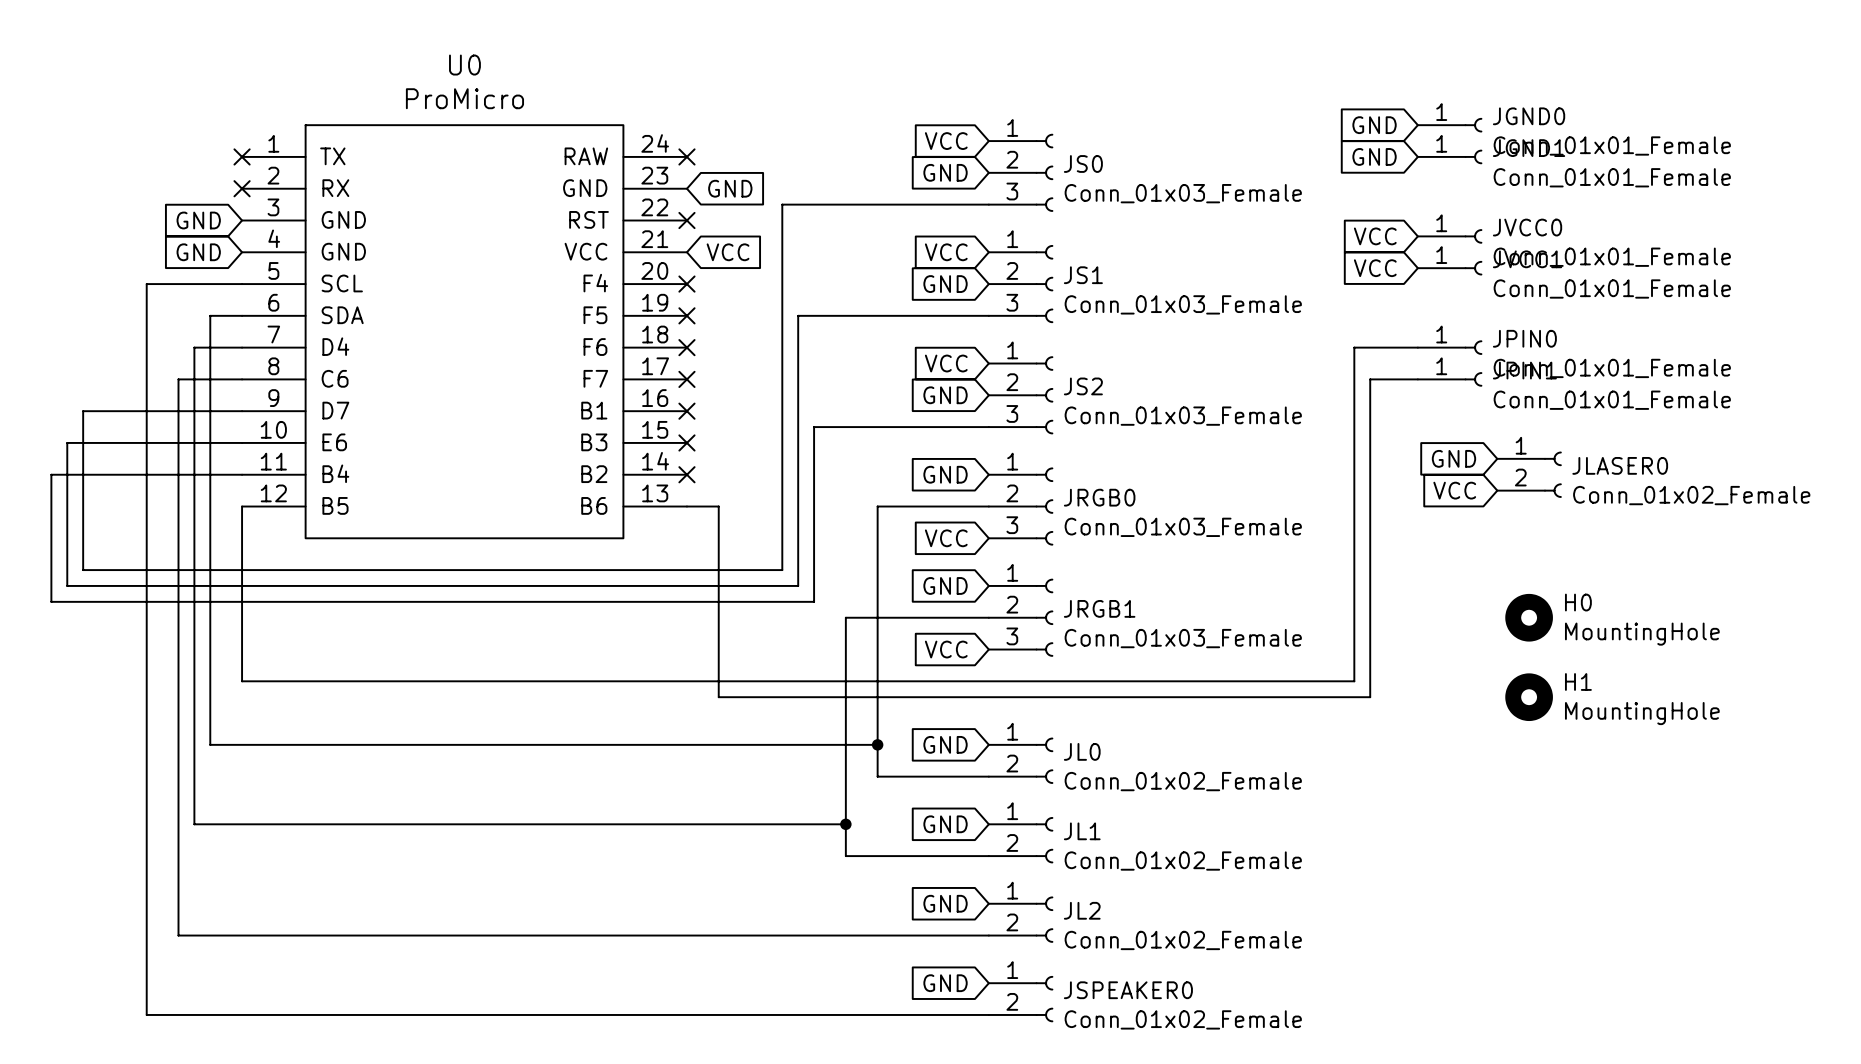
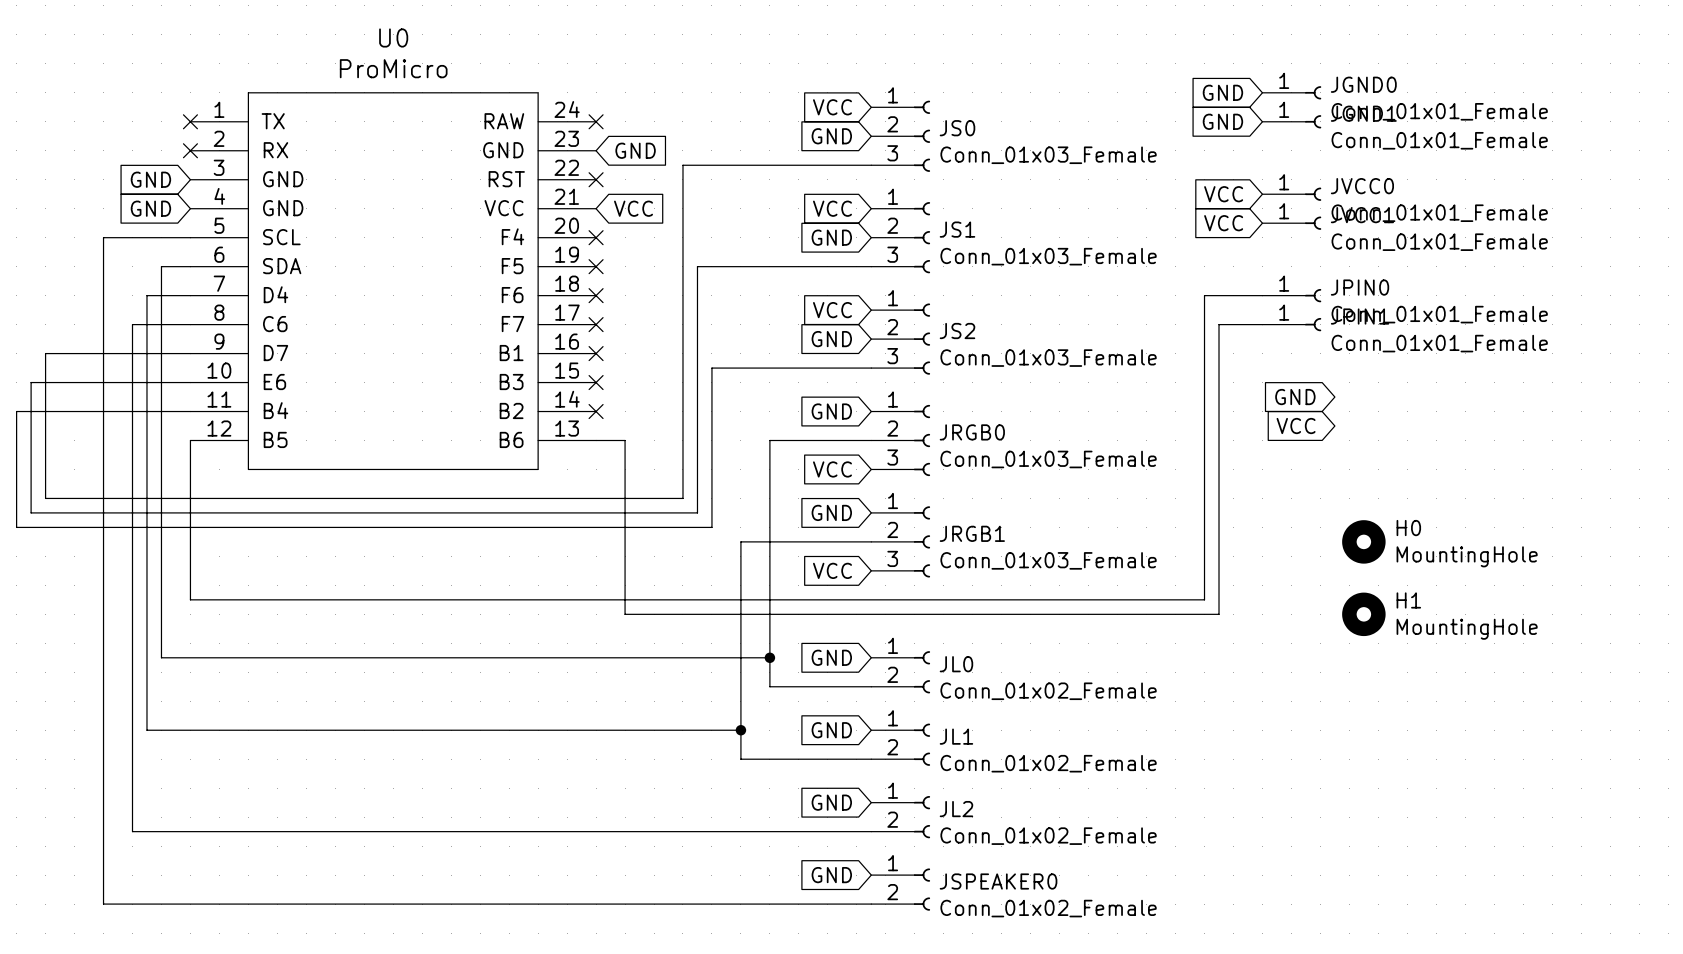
JLASER0: Conn_01x02_Female (1529, 474) -> none

